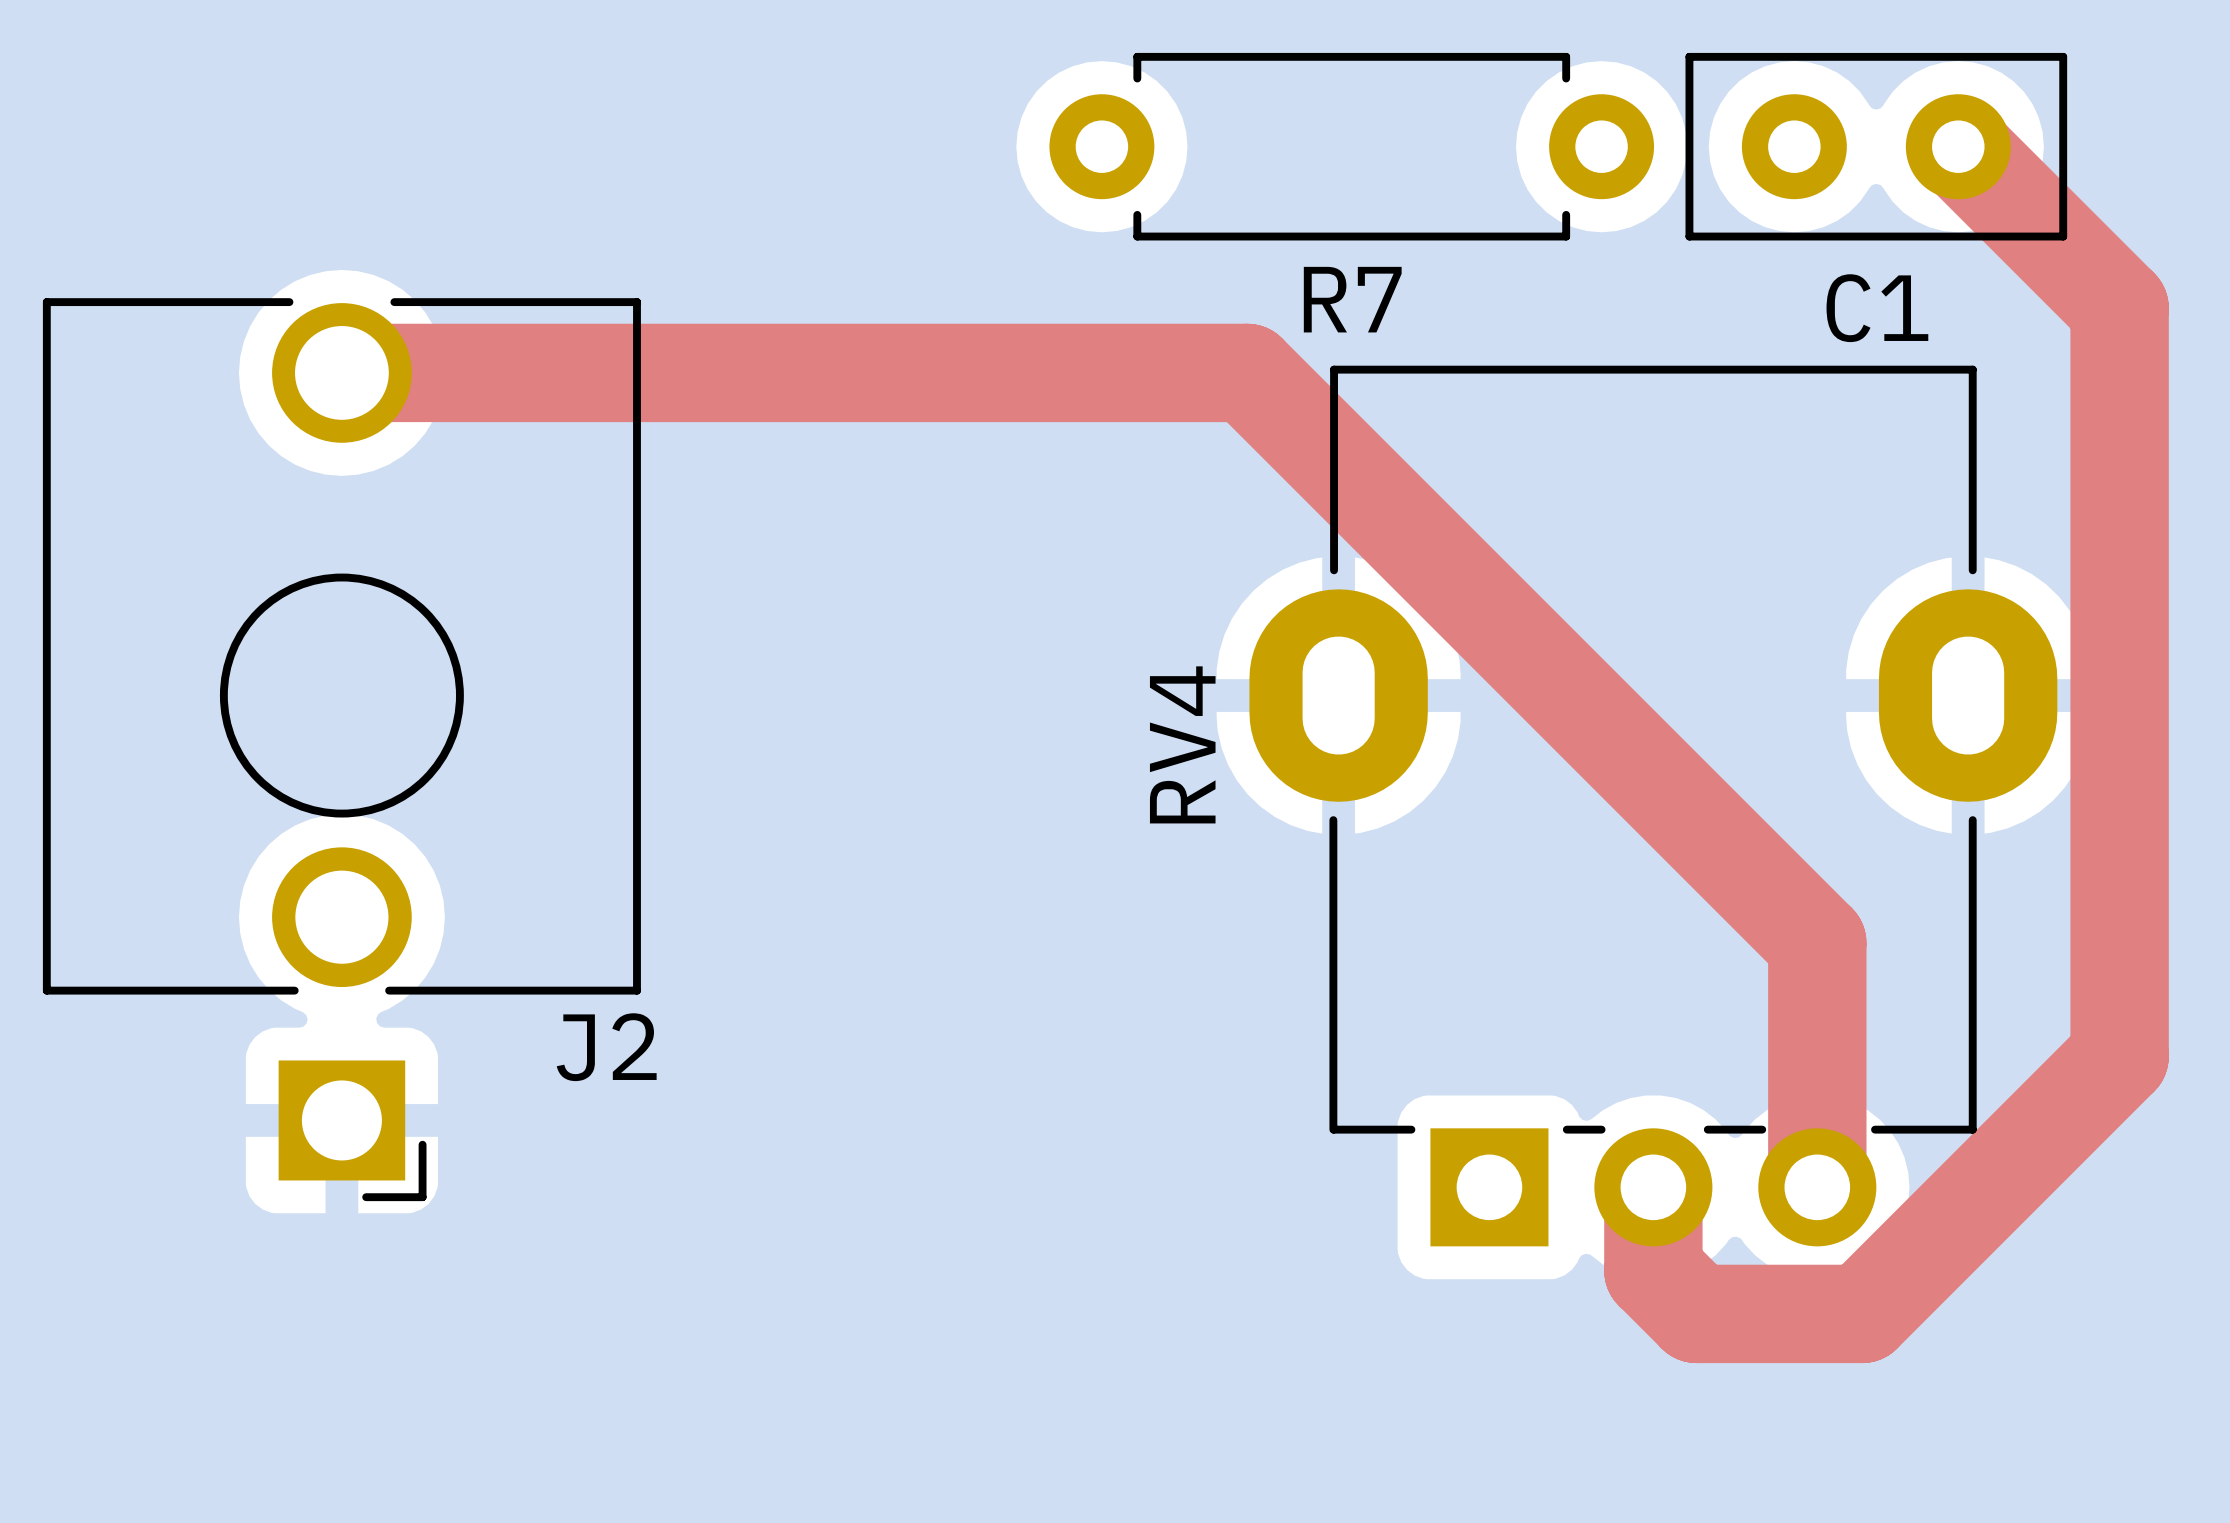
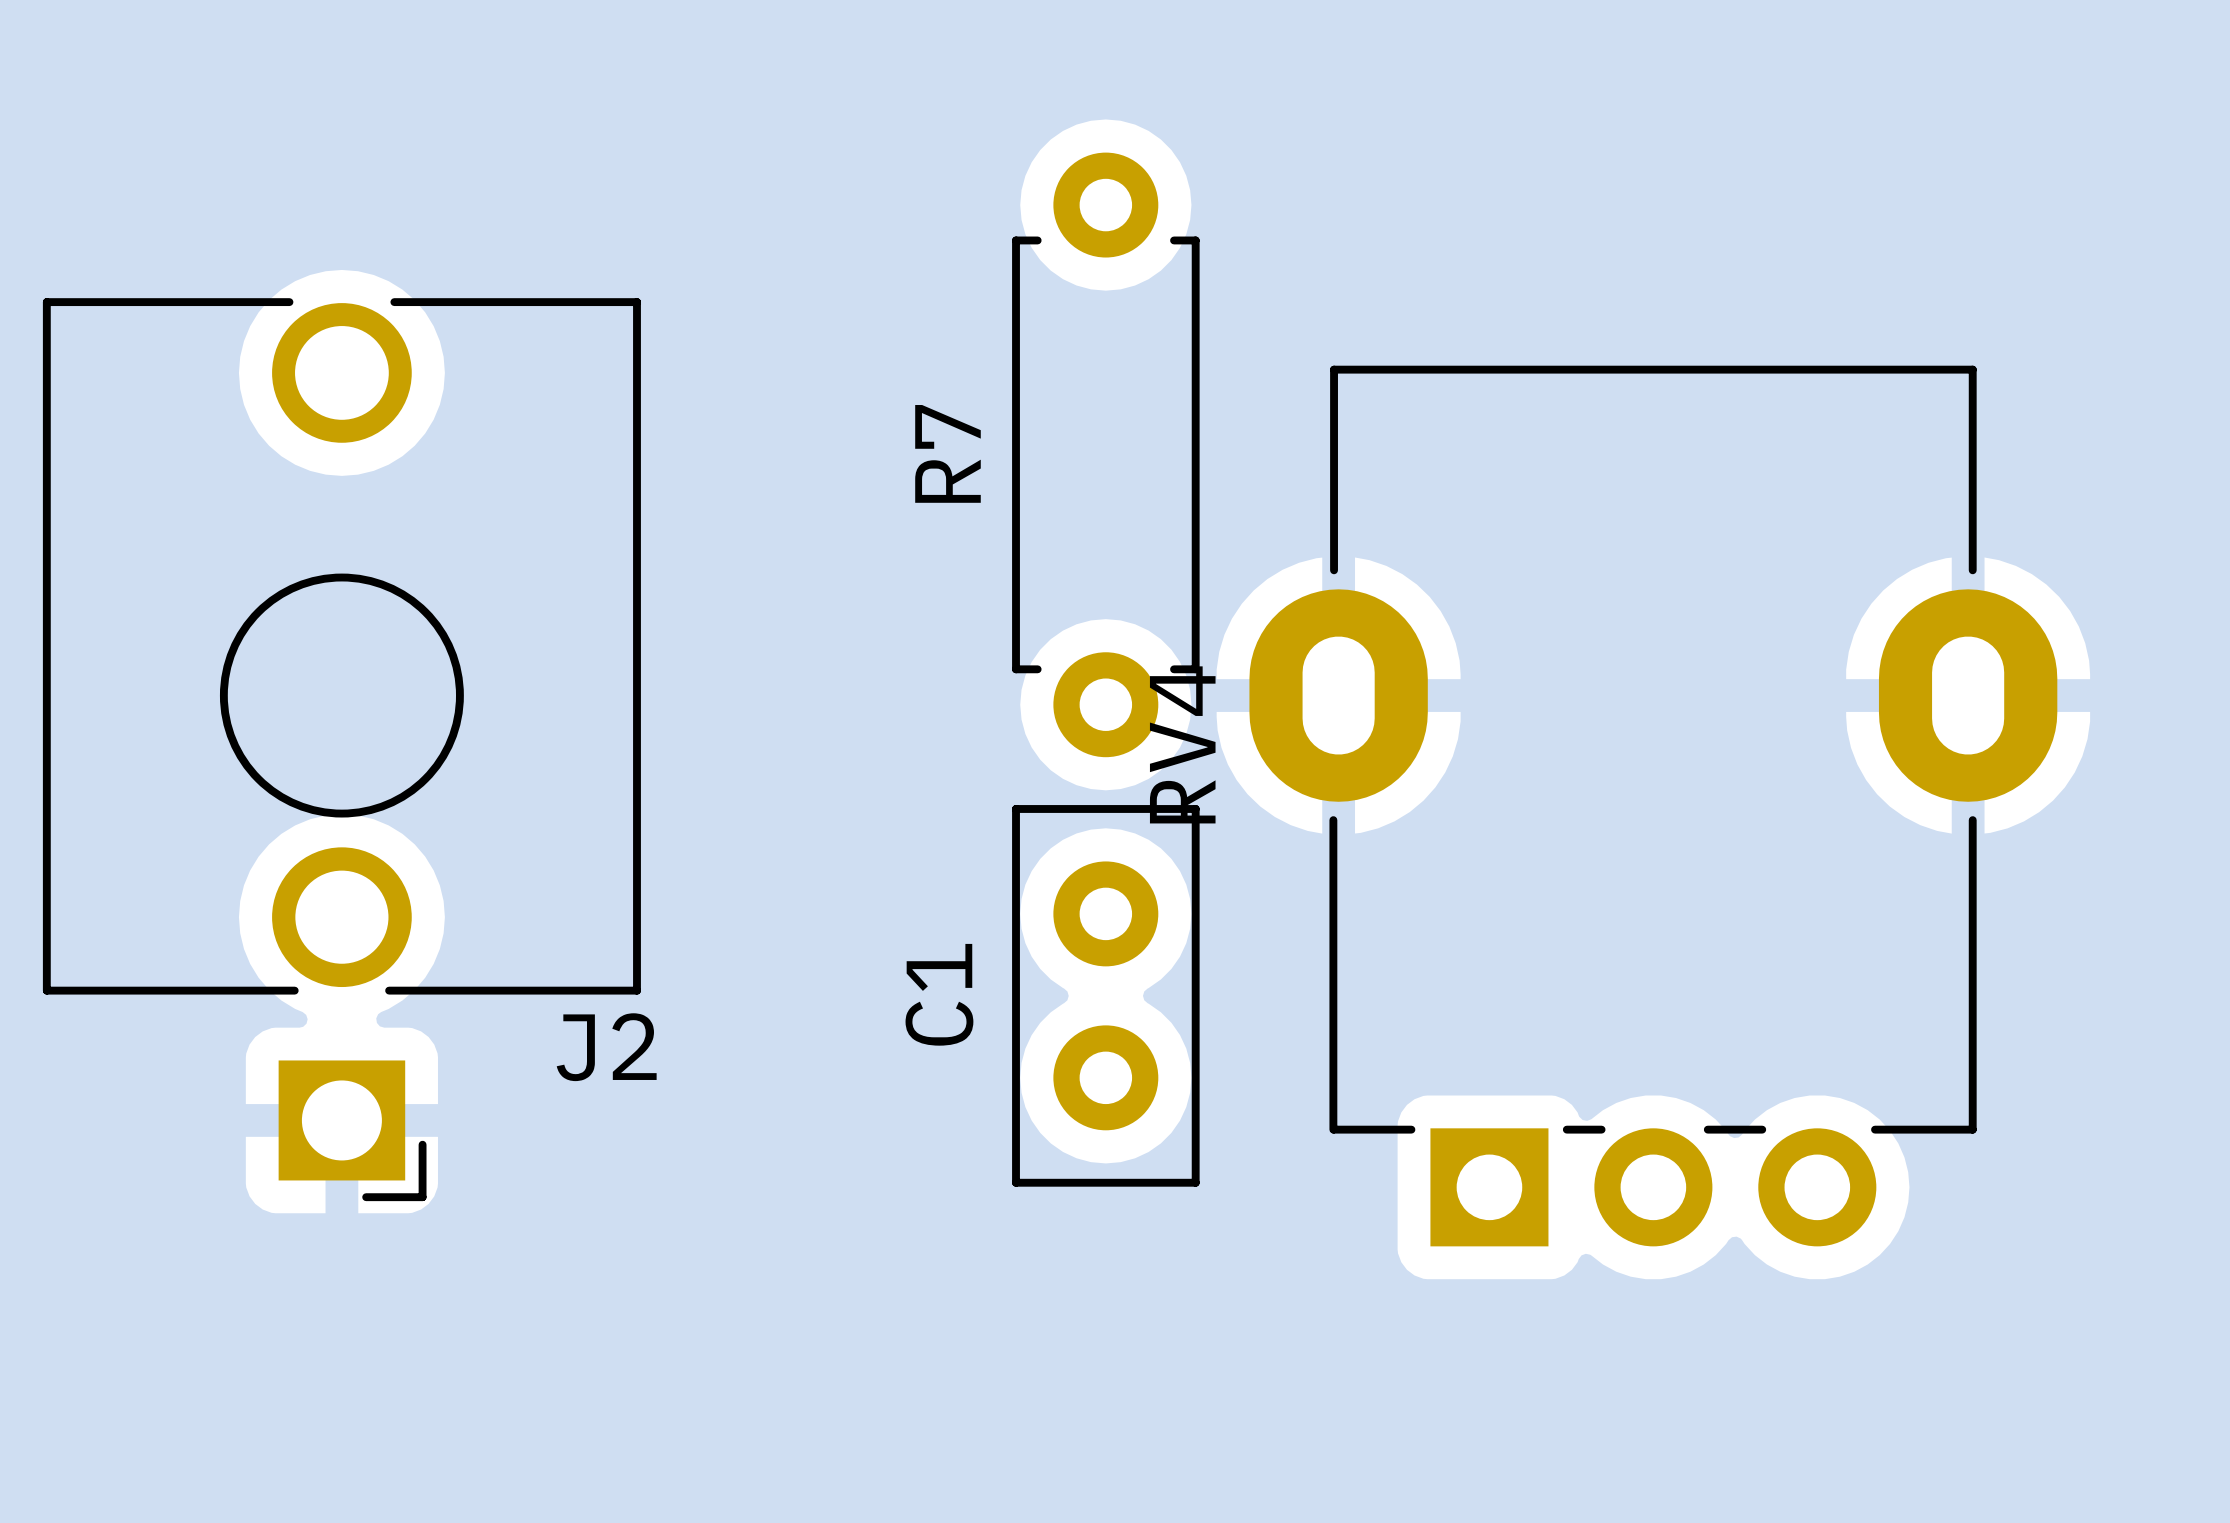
R7 rotation: 0° (1351, 146) -> 90° clockwise (1105, 454)
R7 position: (1351, 146) -> (1105, 454)
C1 rotation: 0° (1876, 146) -> 90° clockwise (1105, 995)
C1 position: (1876, 146) -> (1105, 995)
top track: (1958, 146) (2119, 308) (2119, 1056) (1862, 1313) (1696, 1313) (1653, 1270) (1653, 1187) -> none
top track: (341, 372) (1247, 372) (1817, 942) (1817, 1187) -> none

